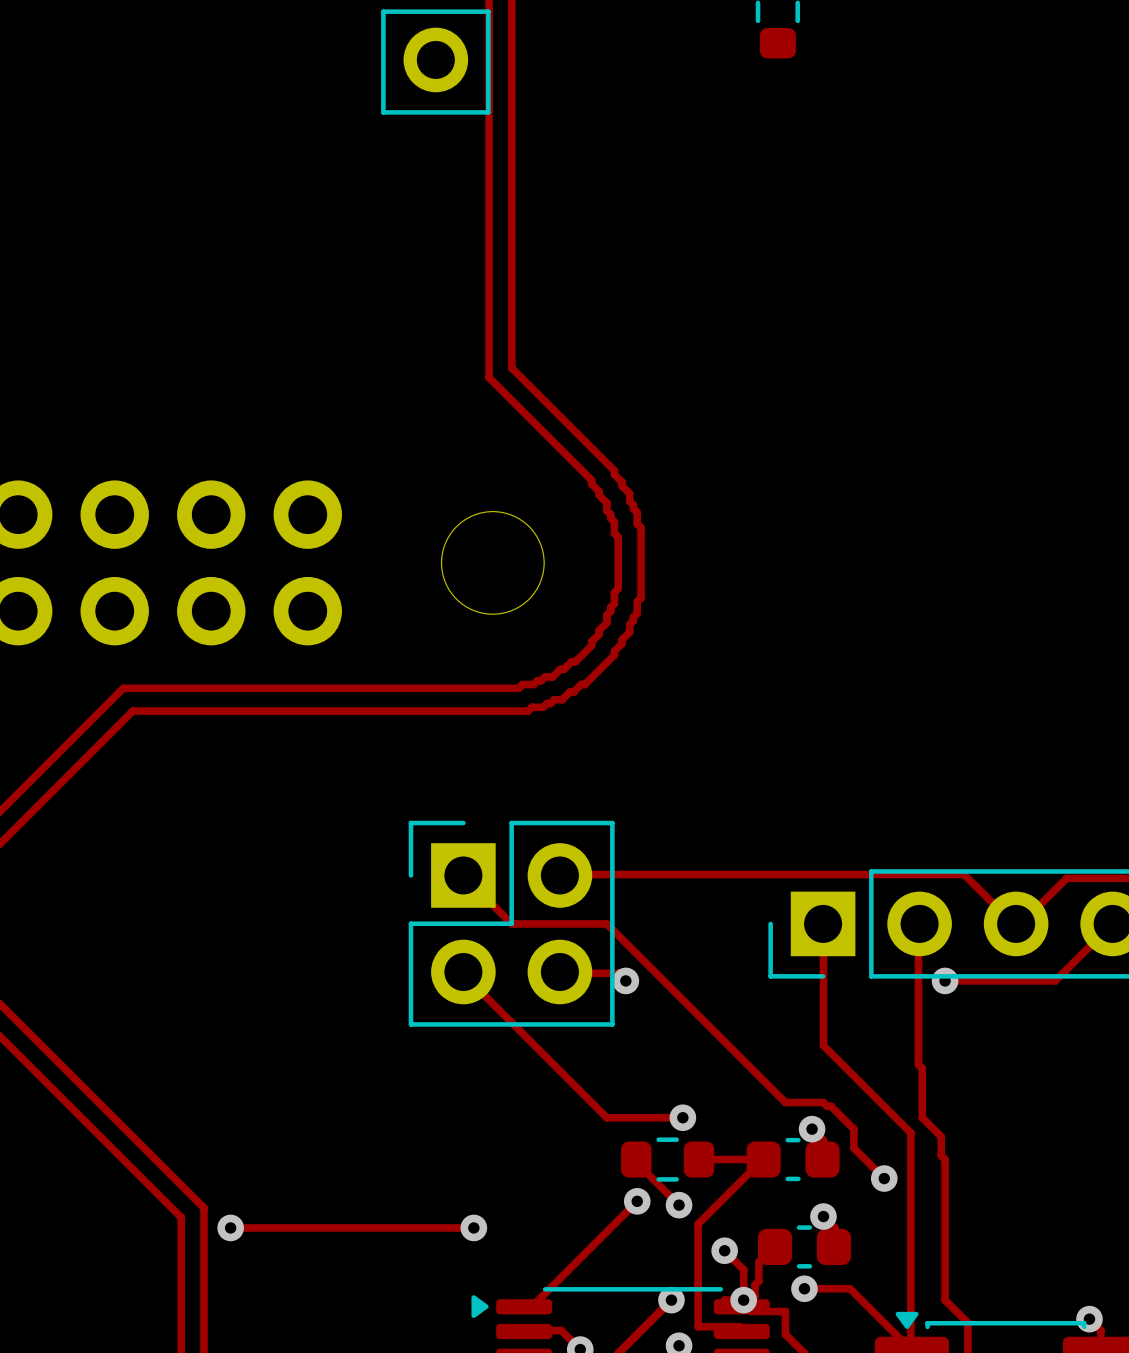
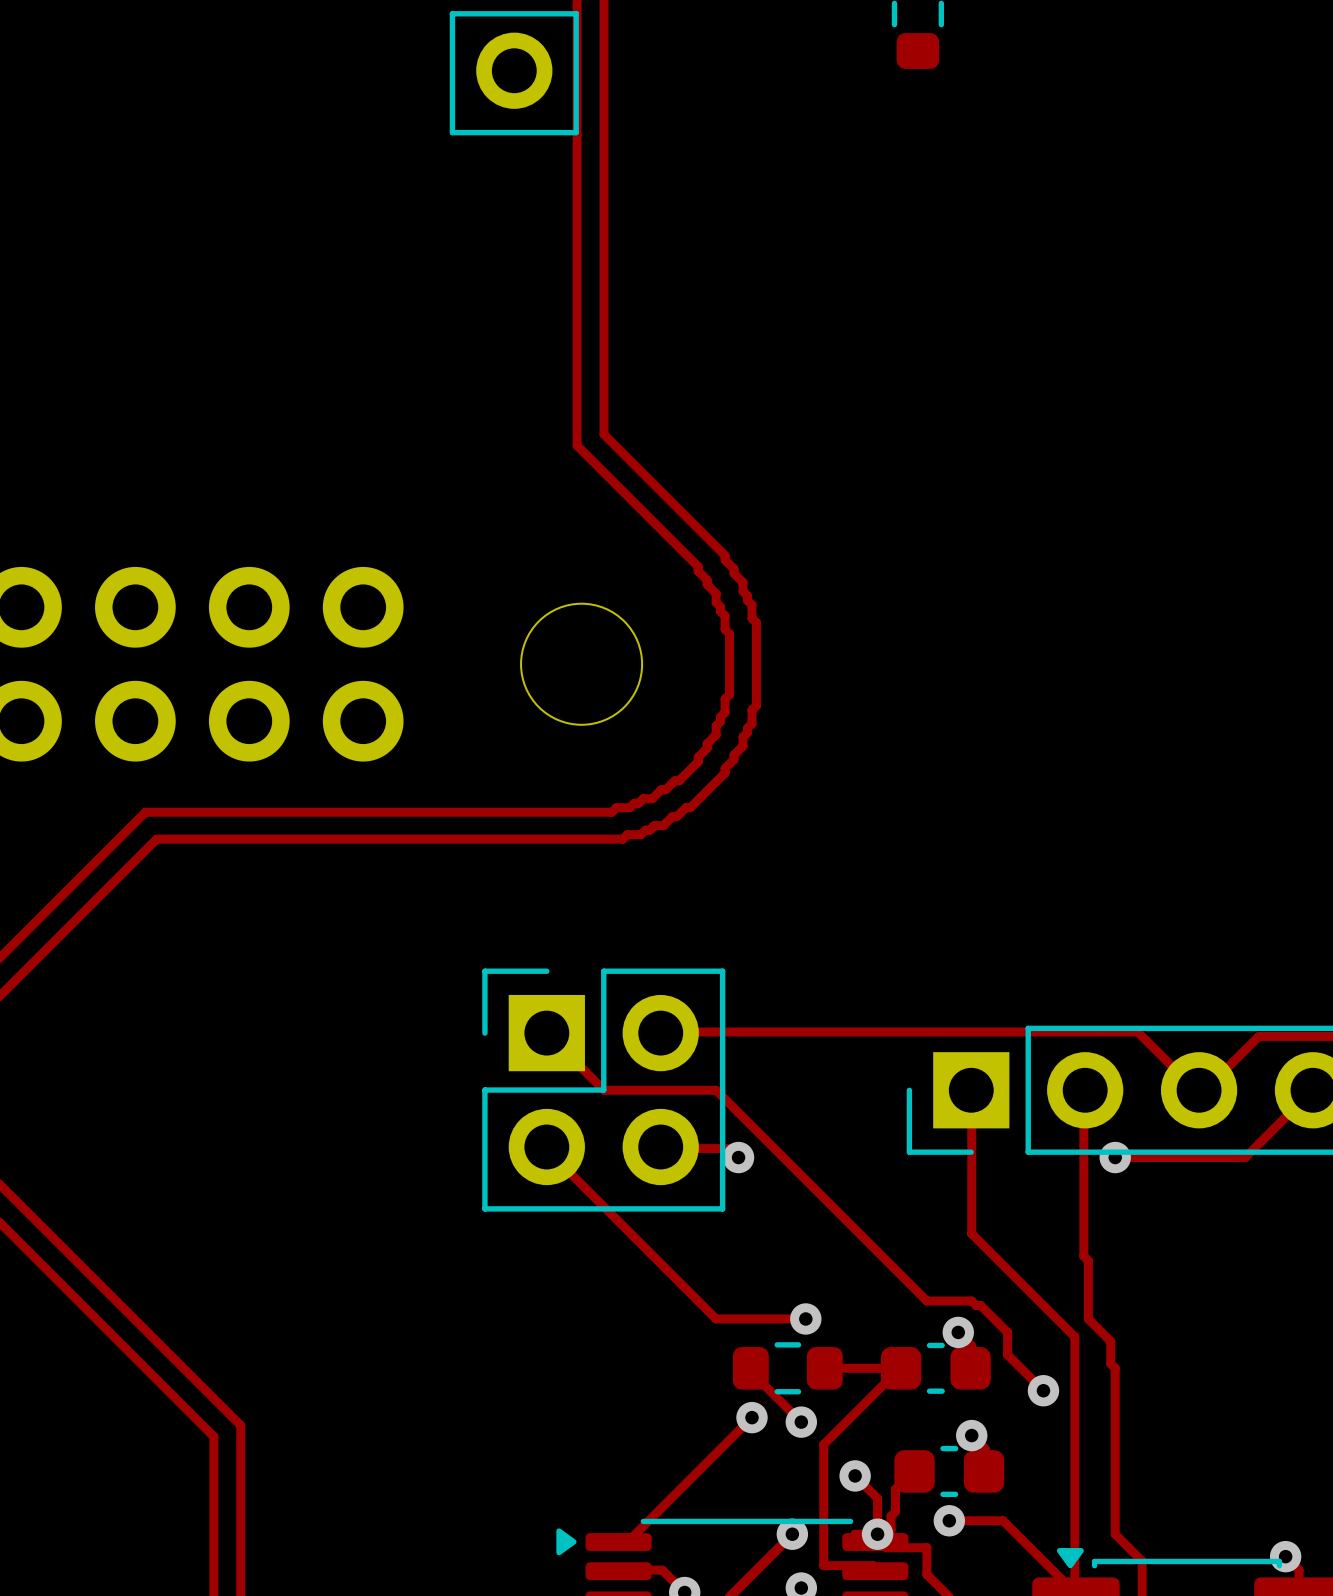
track: (230, 1227) (473, 1227) -> none
via: (230, 1227) -> none
via: (473, 1227) -> none

